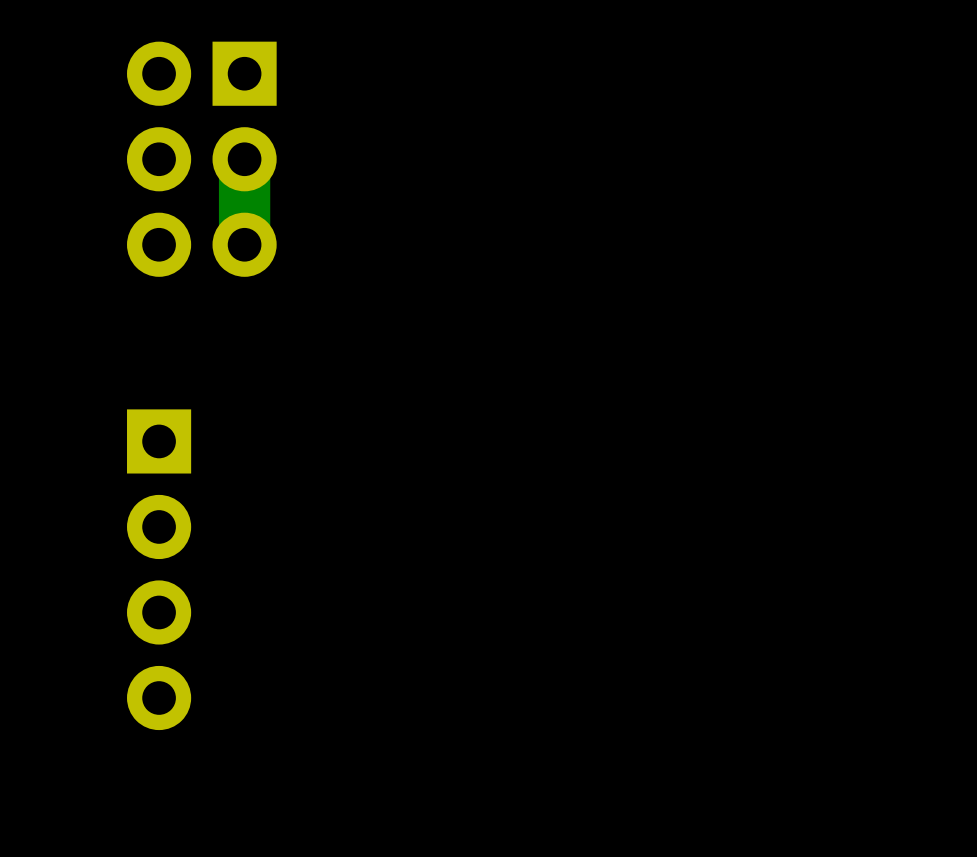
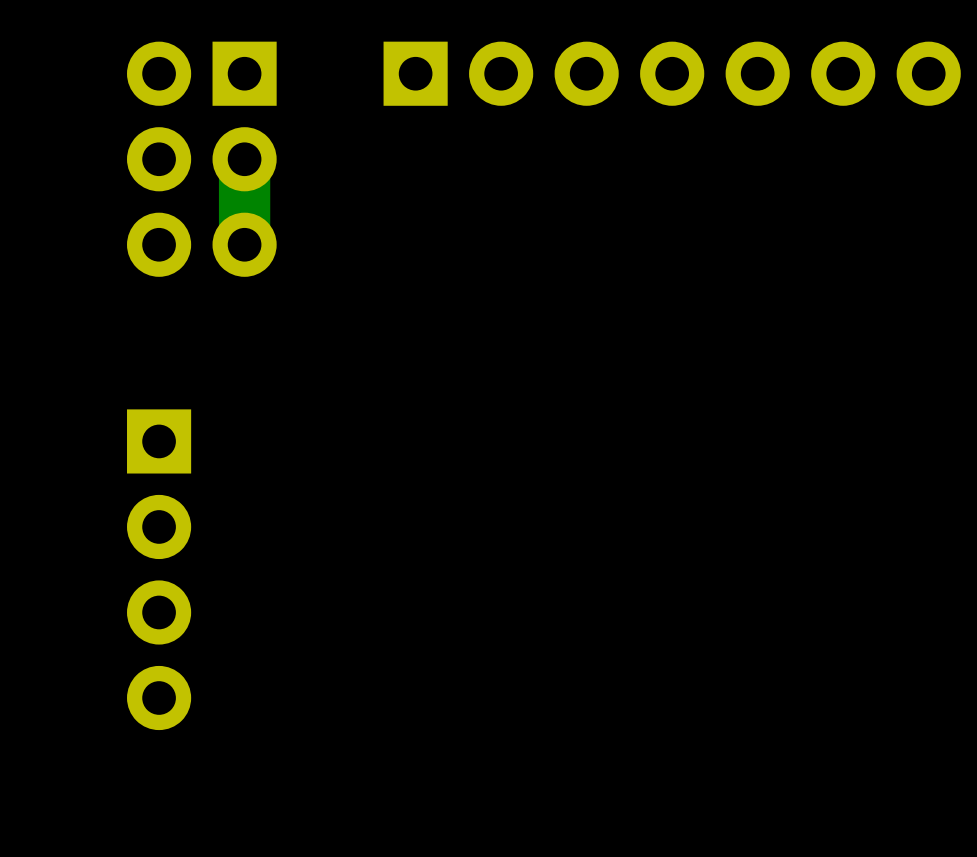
part: none -> (672, 73)

